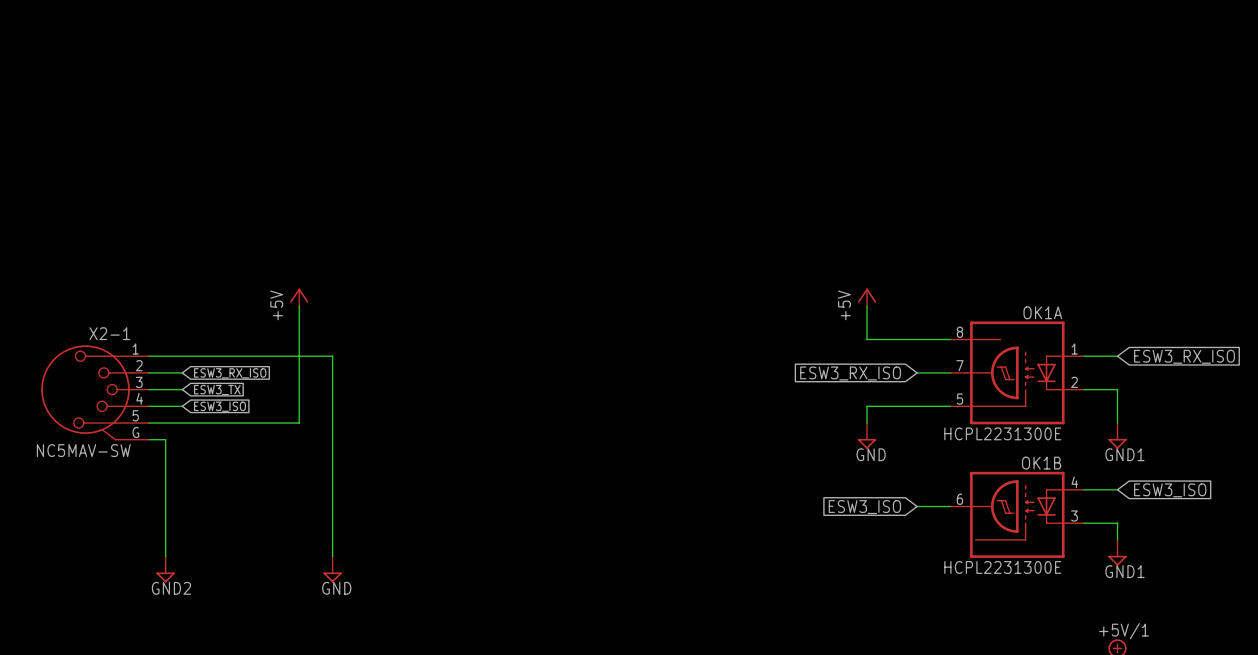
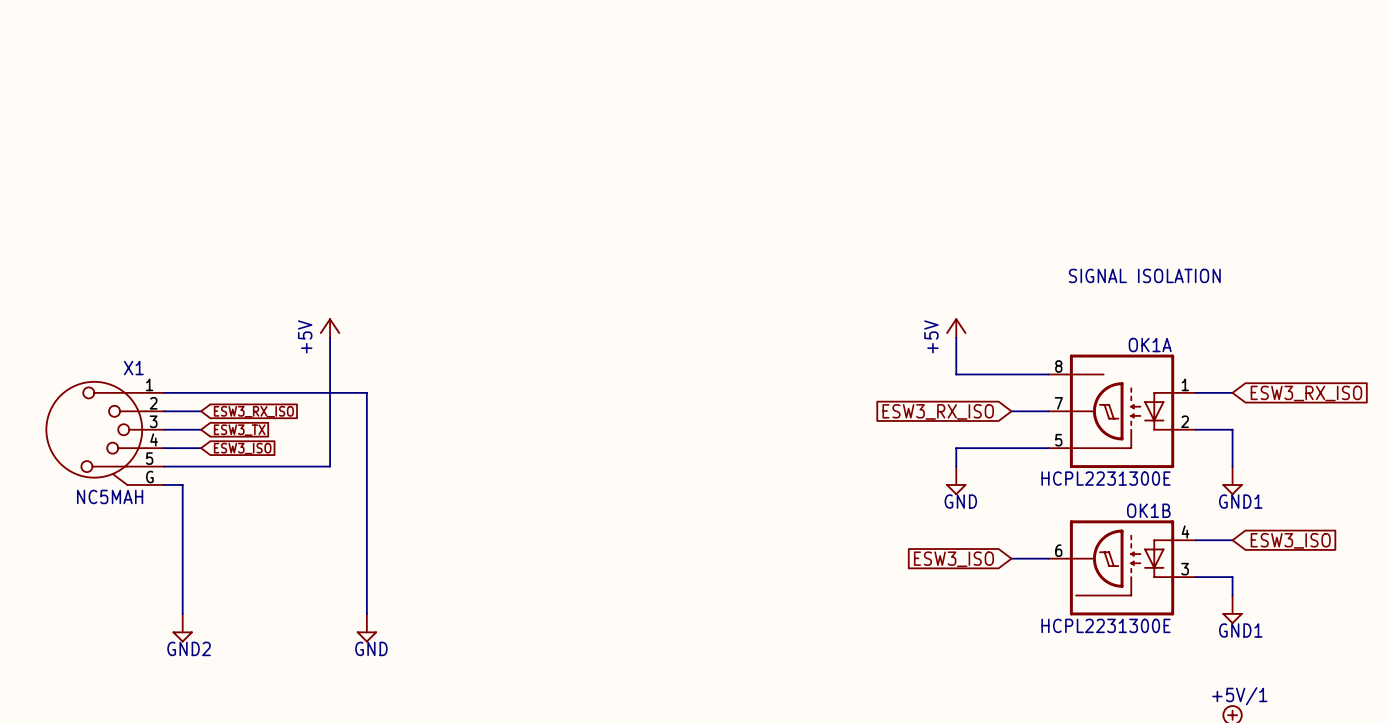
text: none -> SIGNAL ISOLATION (1144, 275)
X2-1 name: X2-1 (109, 333) -> X1 (133, 368)
X2-1 value: NC5MAV-SW (83, 450) -> NC5MAH (110, 496)

